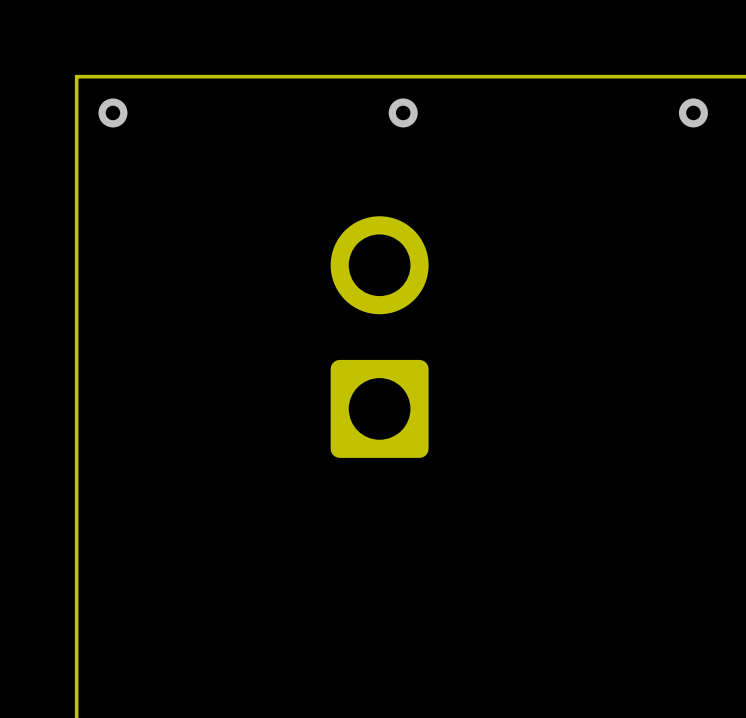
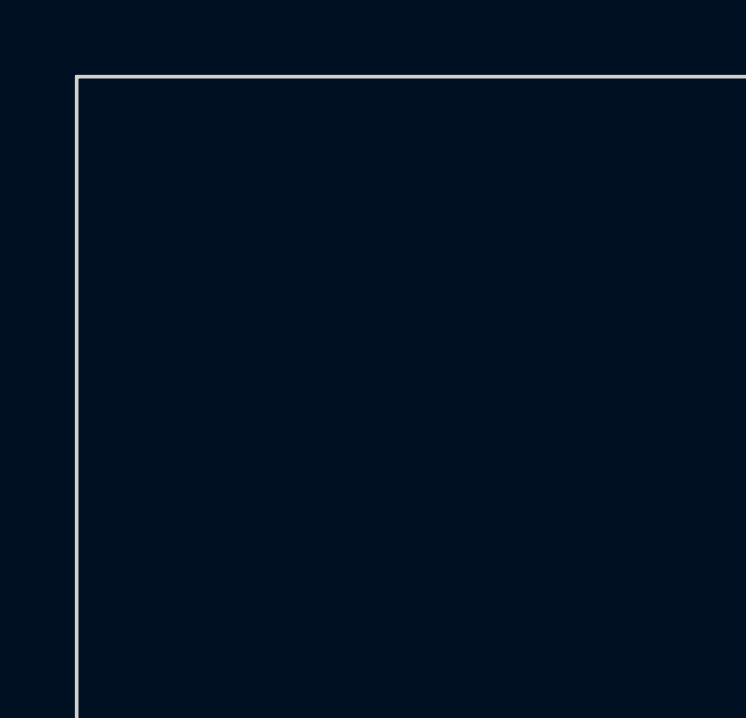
via: (112, 112) -> none
via: (403, 112) -> none
via: (693, 112) -> none
part: (379, 337) -> none

